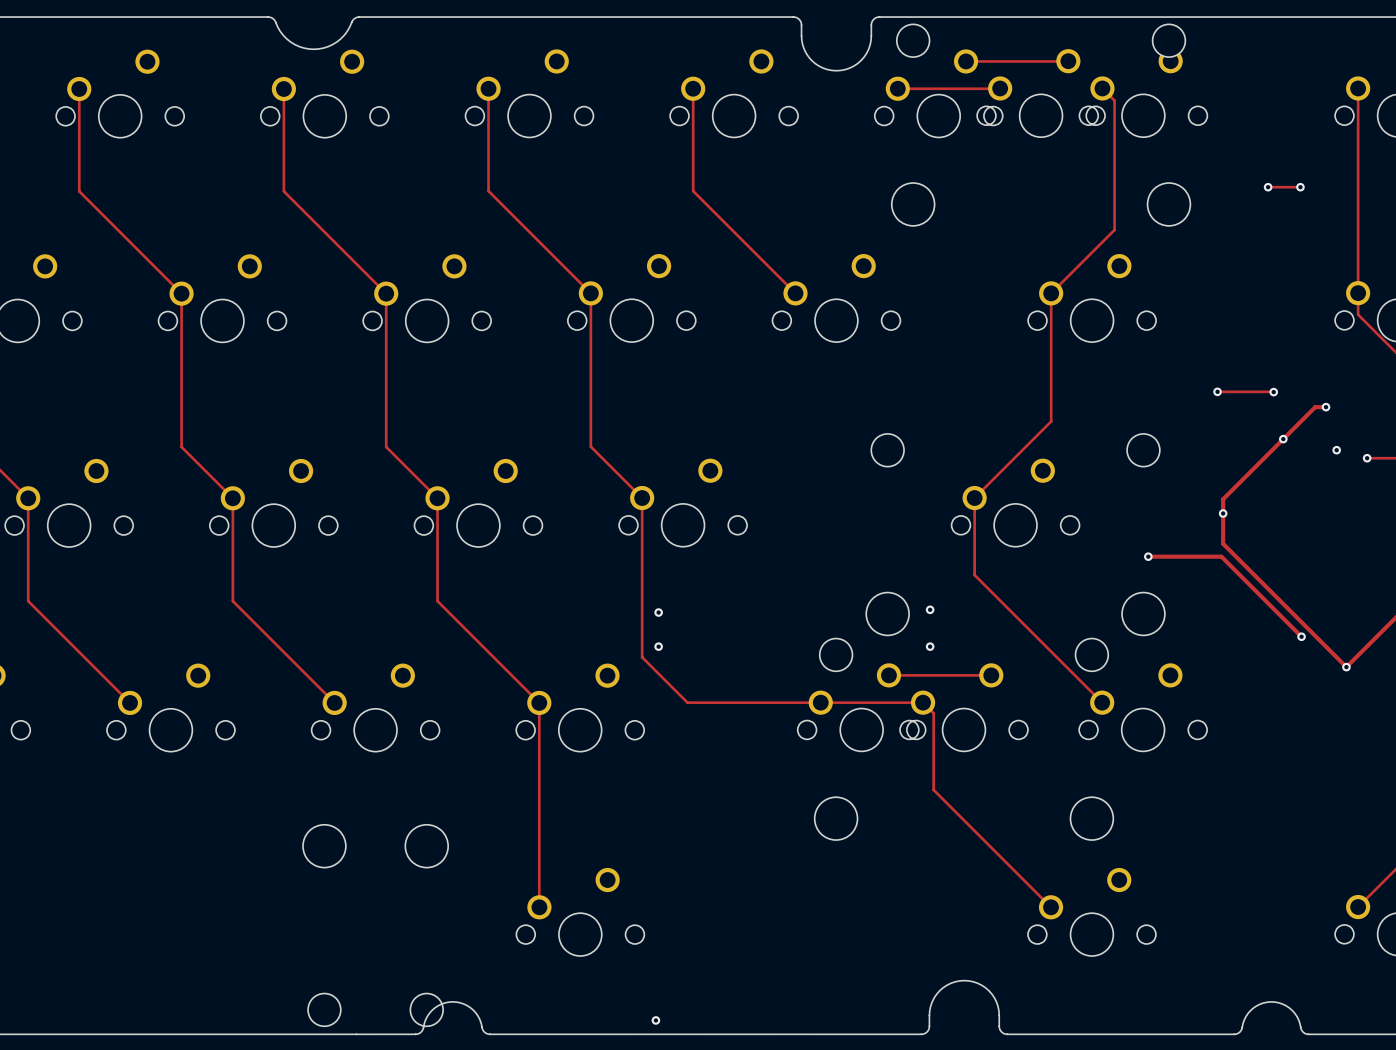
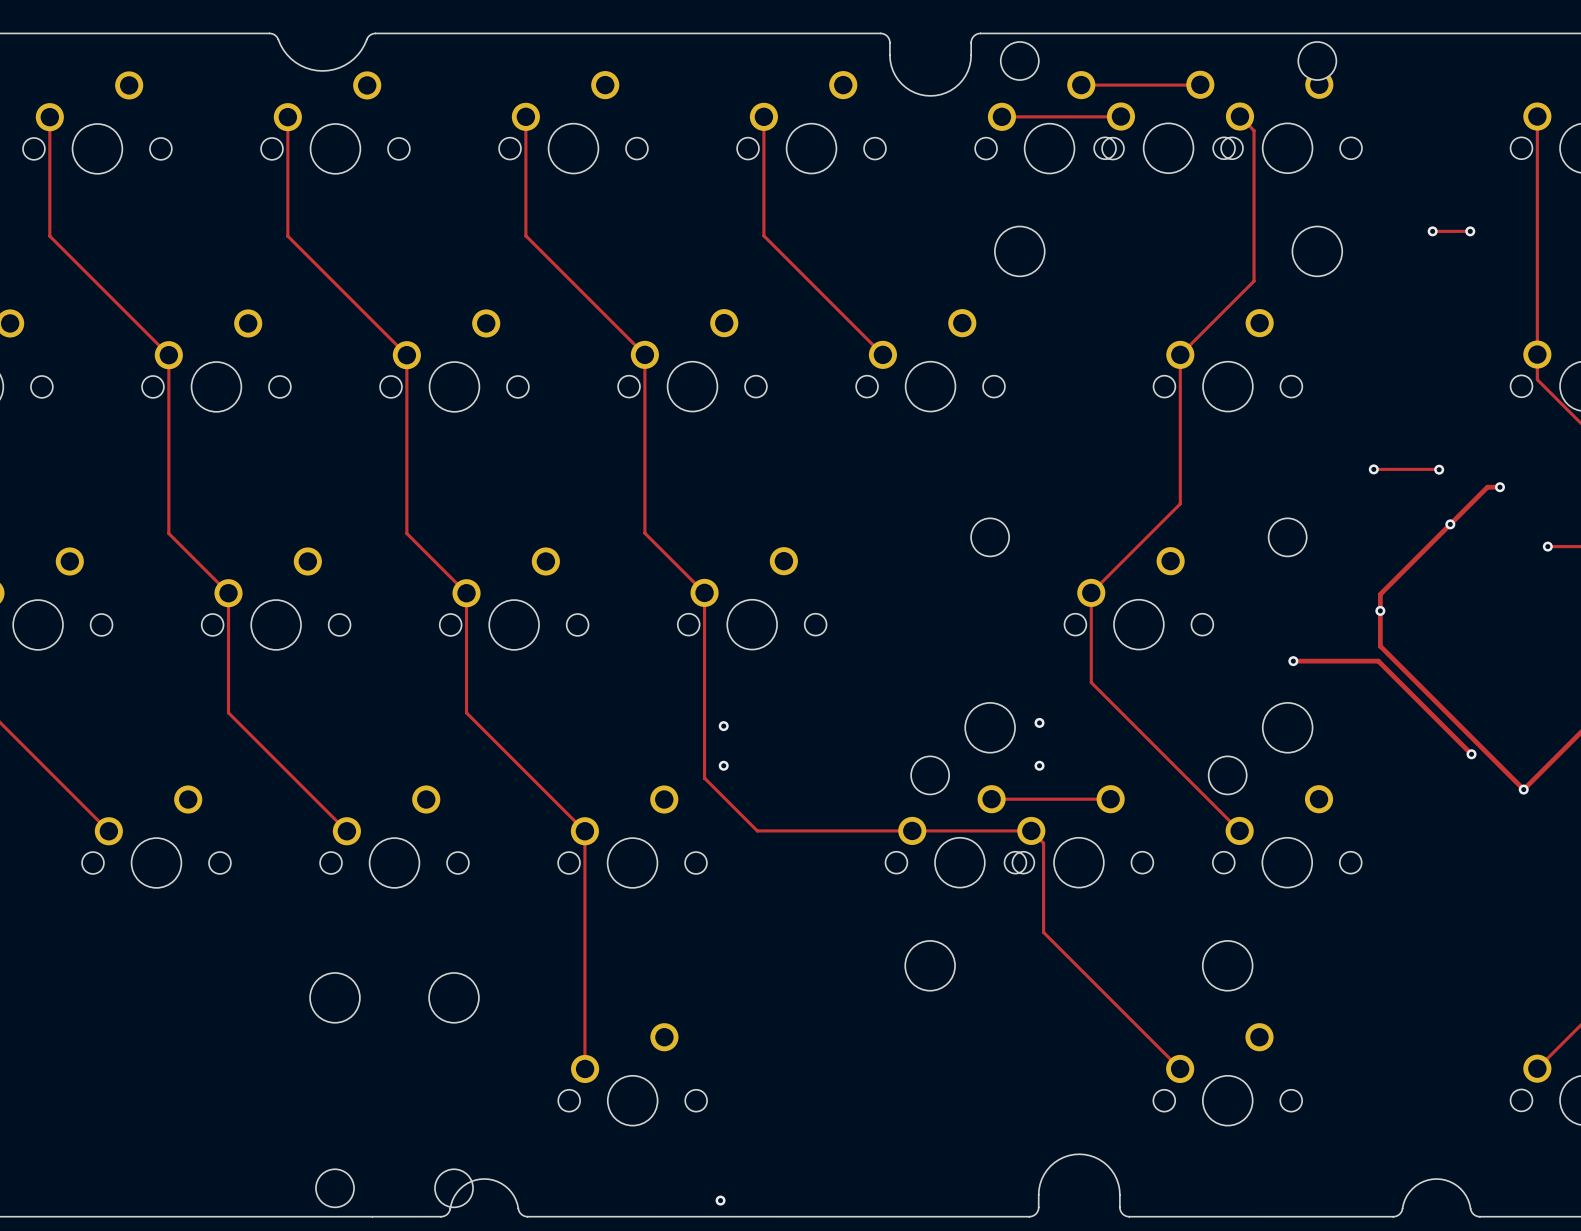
via: (1336, 450) -> none

